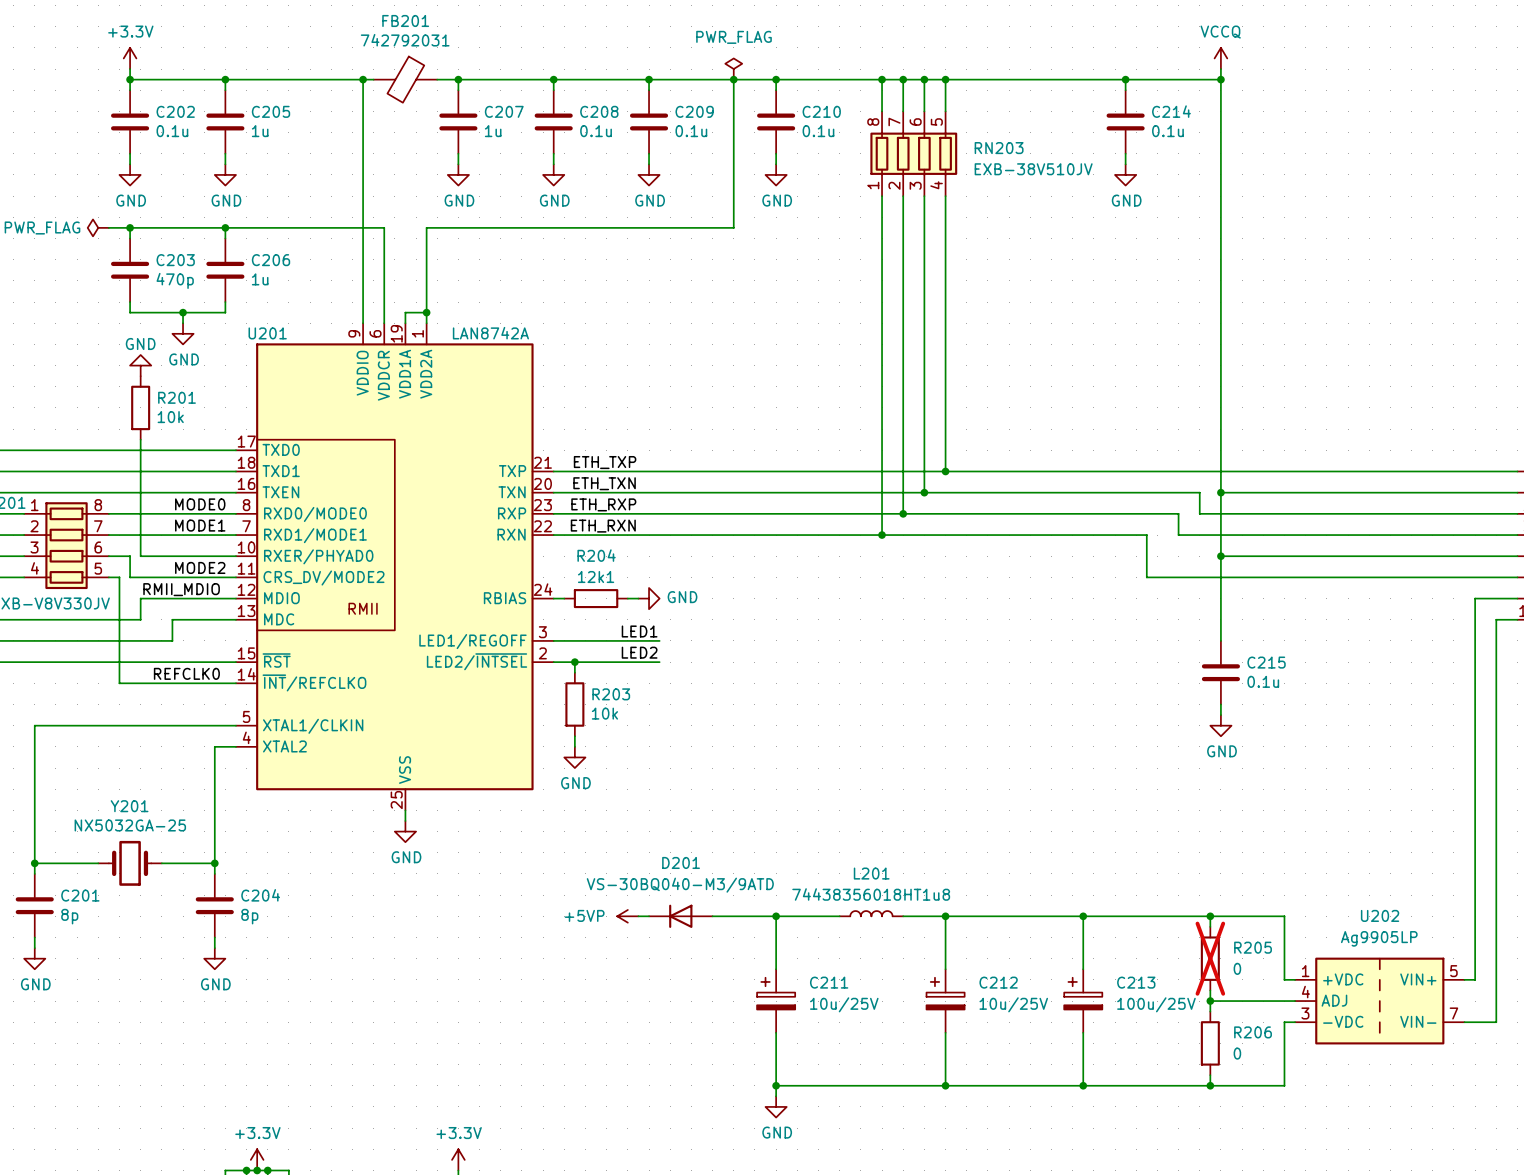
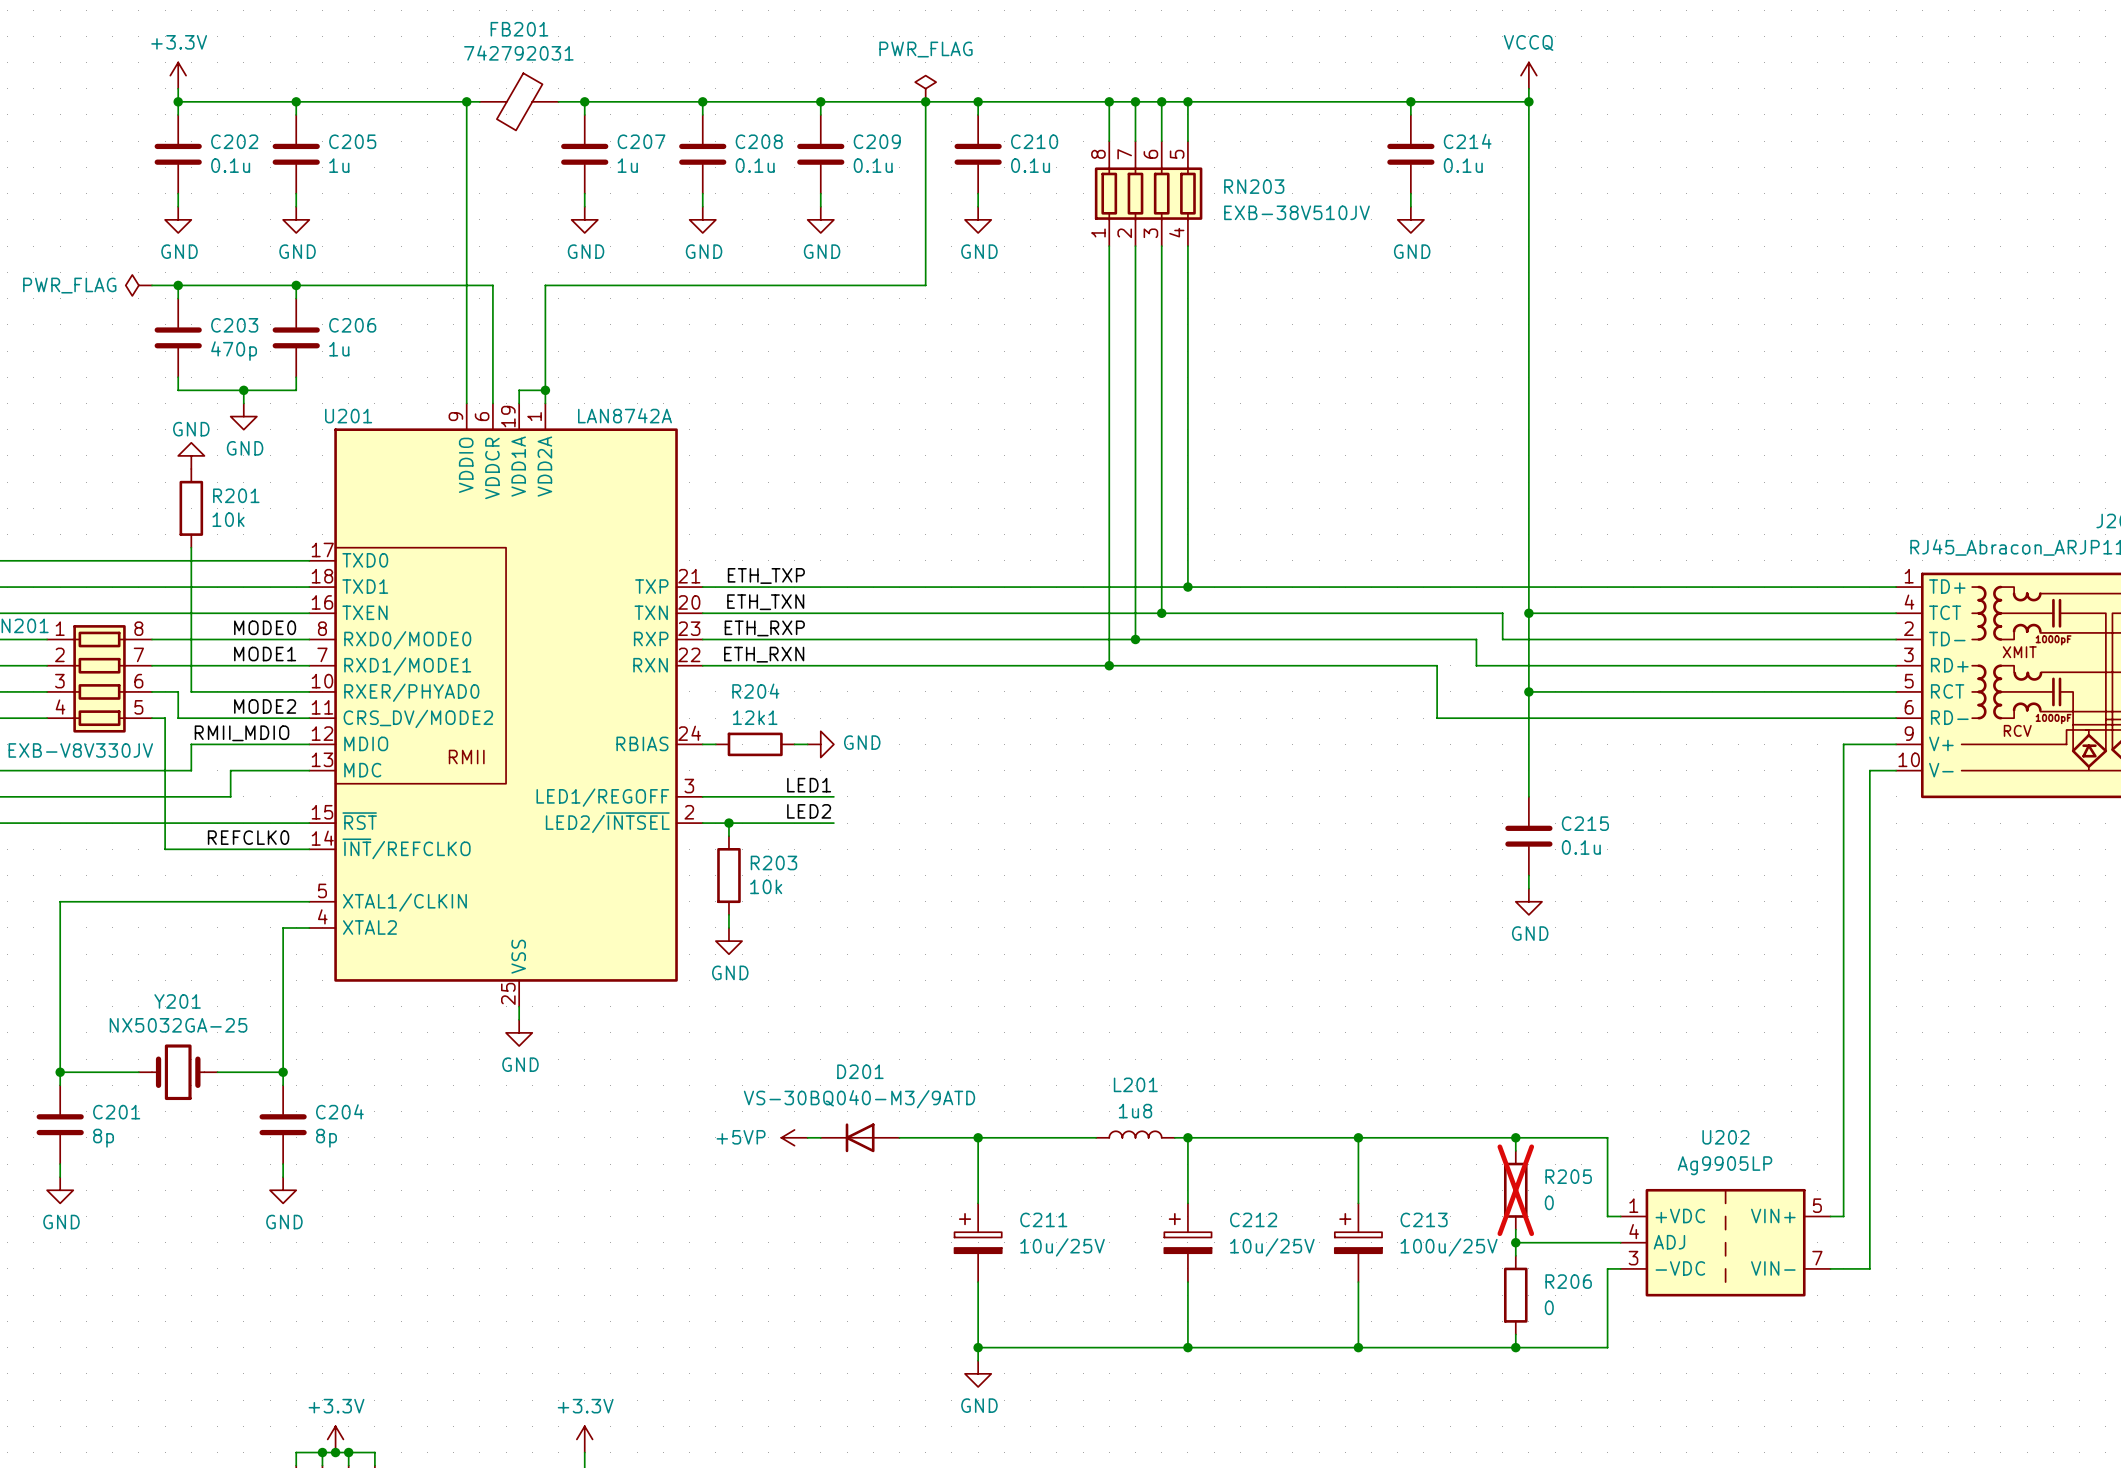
L201 value: 74438356018HT1u8 (871, 894) -> 1u8 (1135, 1111)
L201 position: (871, 913) -> (1135, 1134)
wire: (903, 916) (934, 916) -> (1056, 1137) (1096, 1137)

